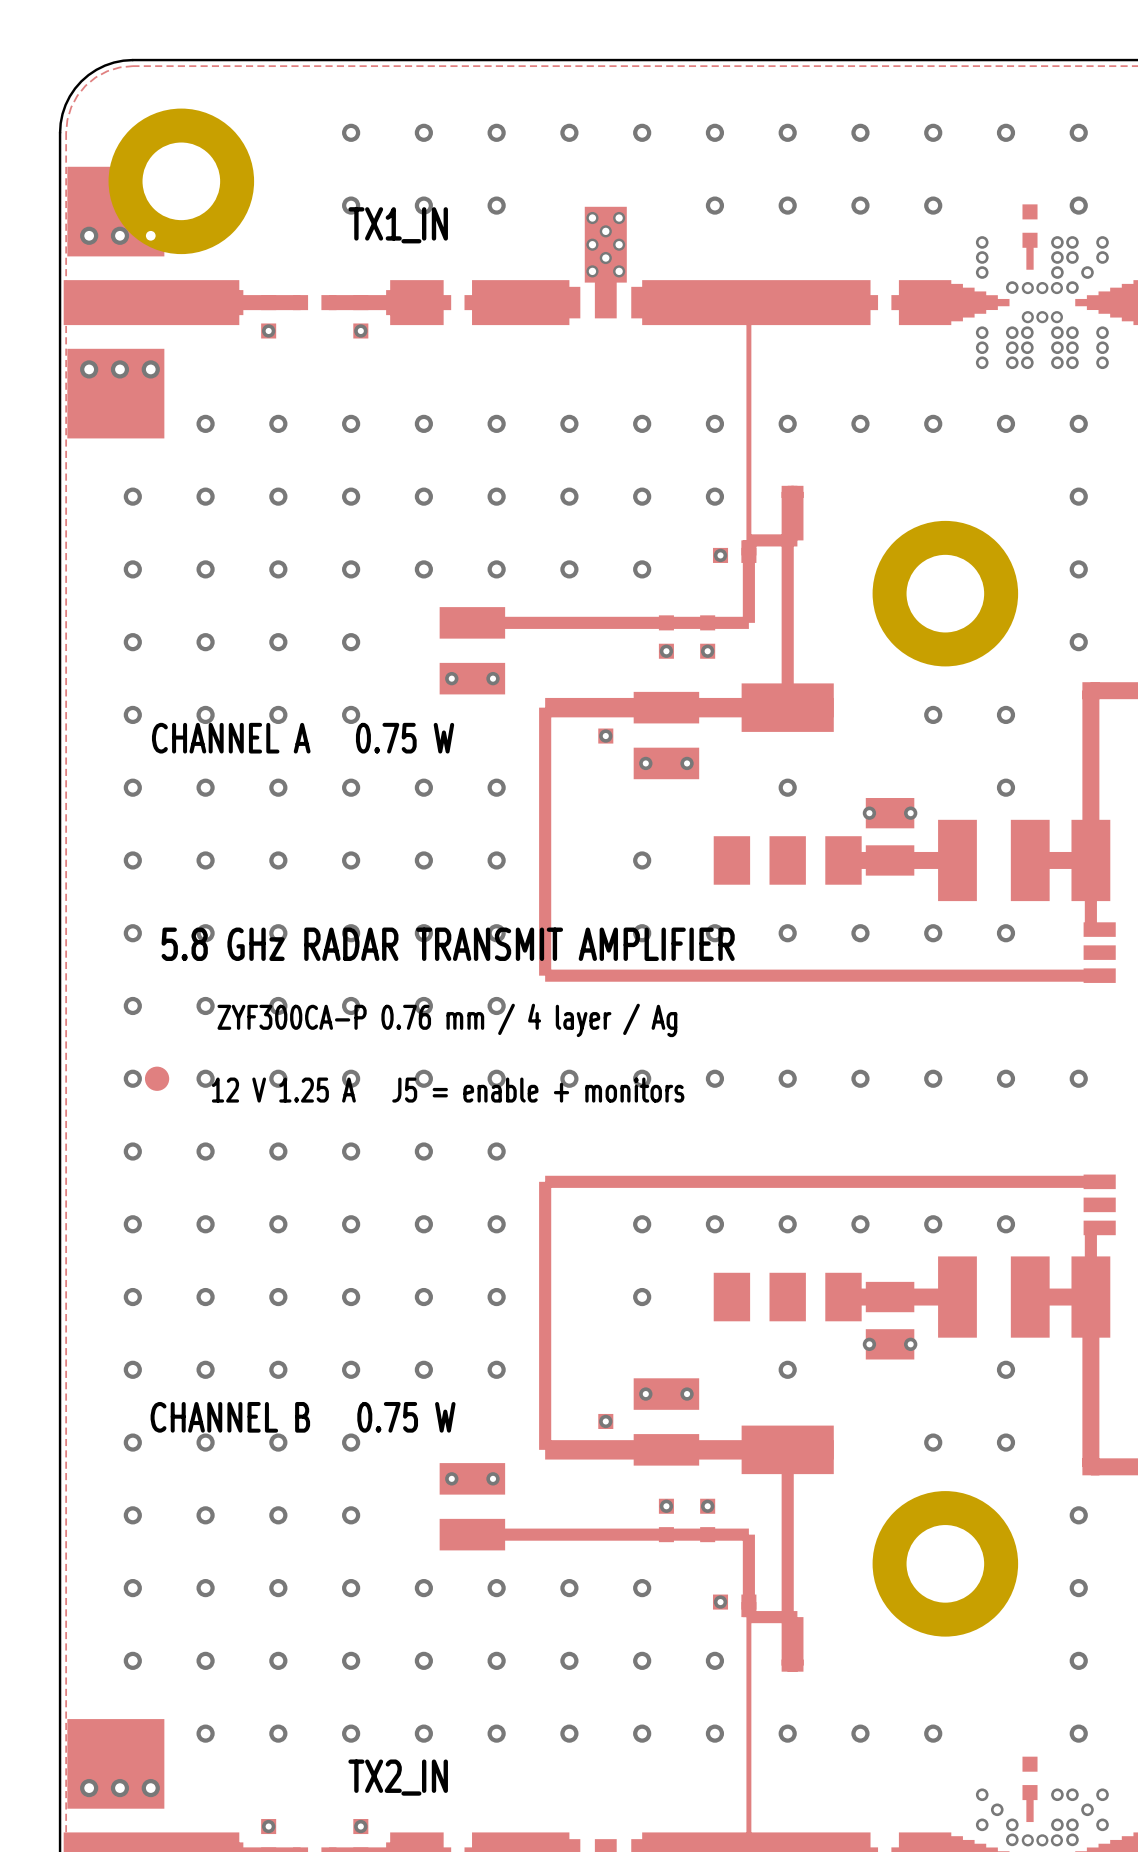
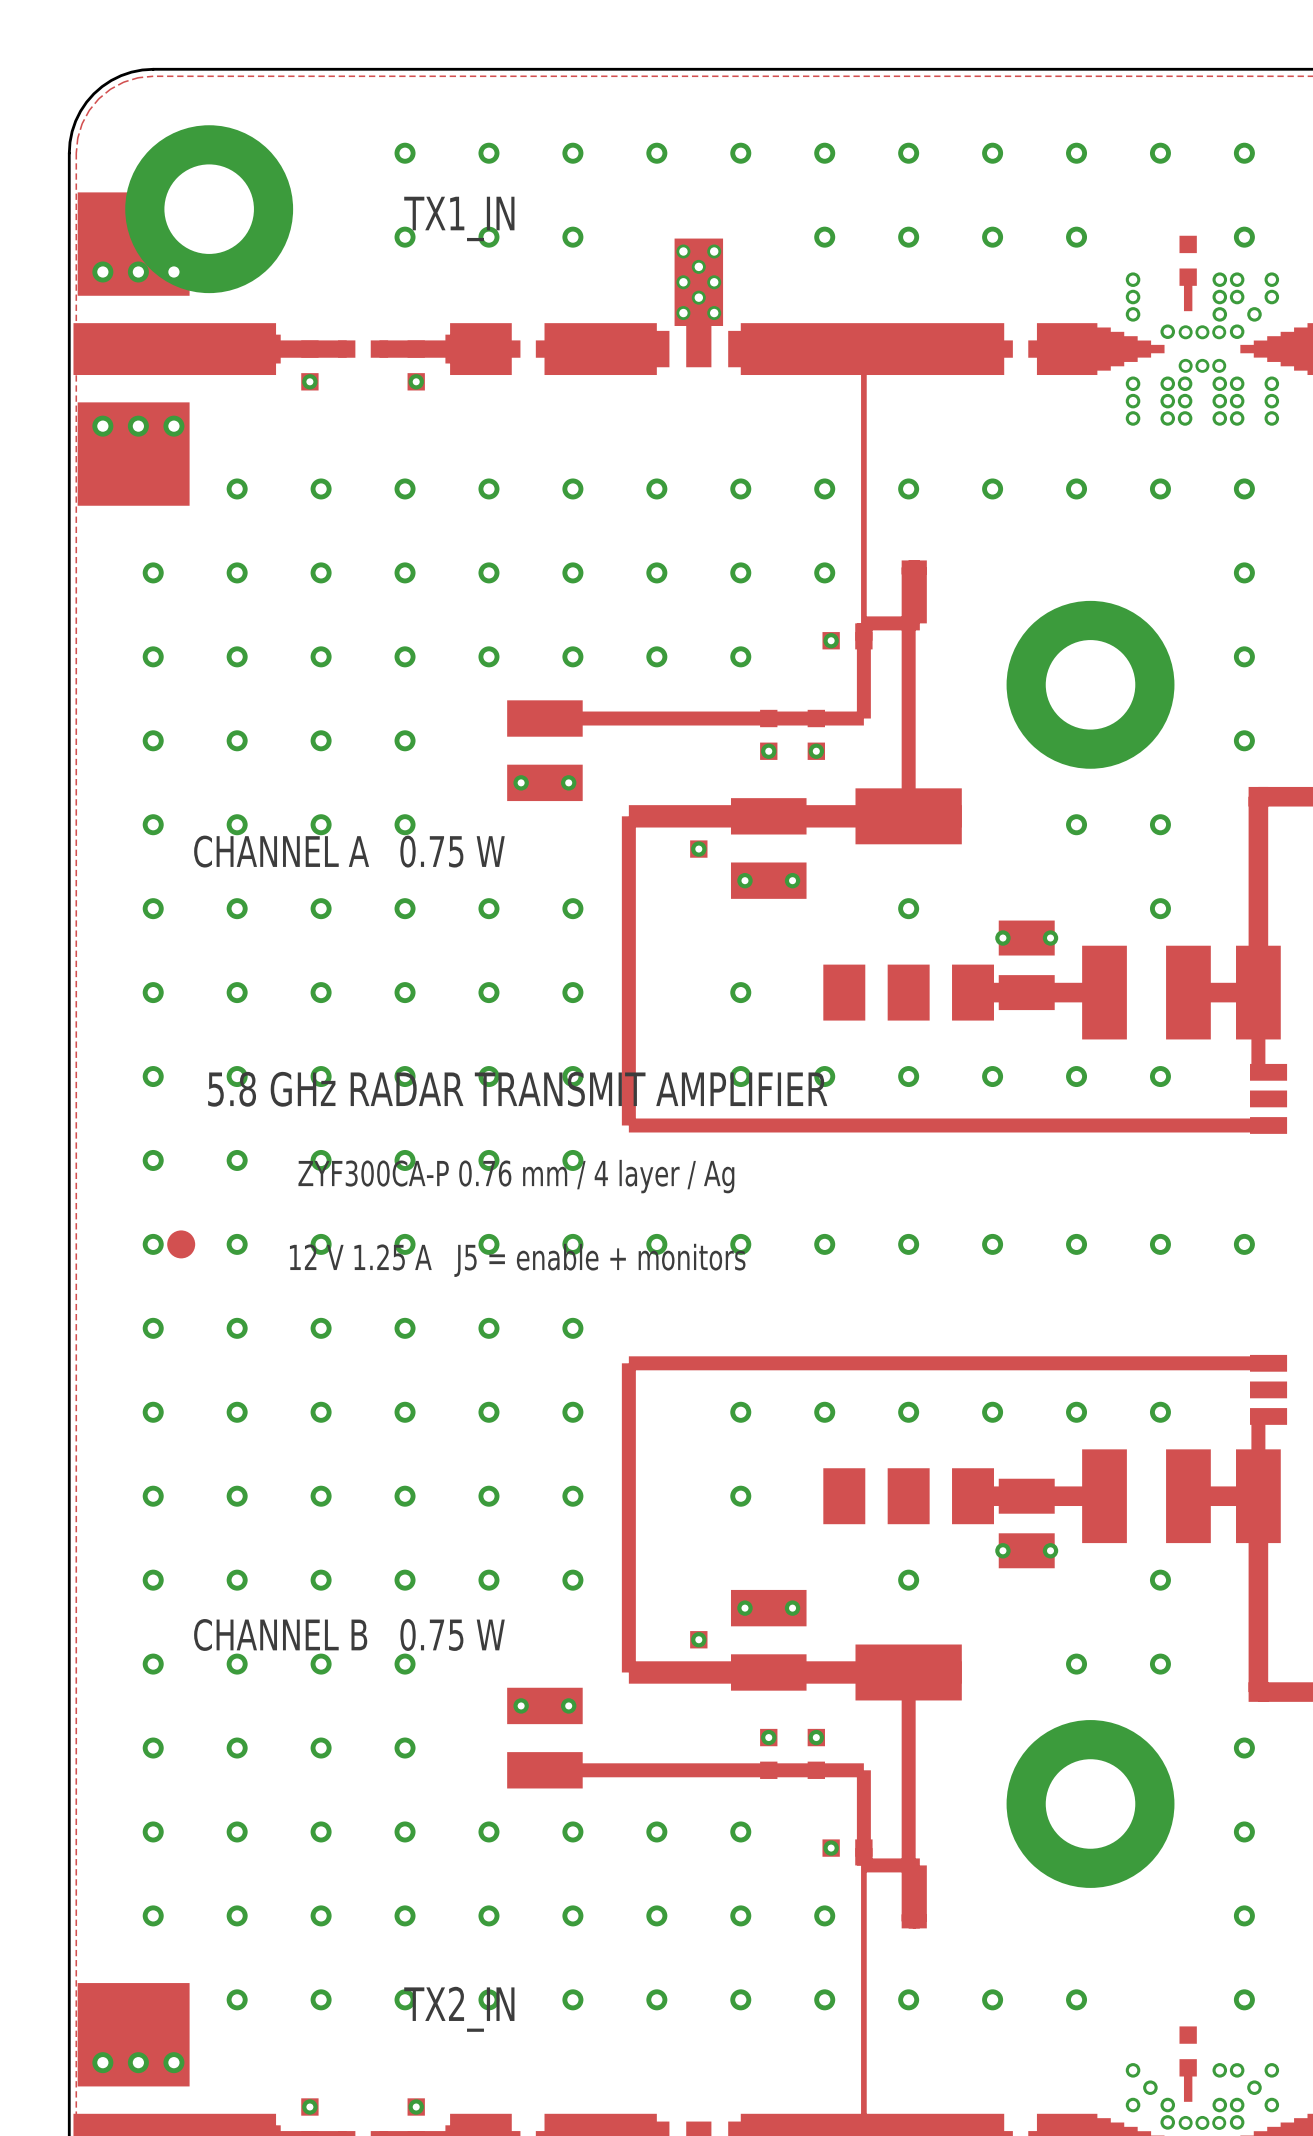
text position: TX1_IN (398, 225) -> TX1_IN (459, 218)
text position: TX2_IN (398, 1777) -> TX2_IN (459, 2009)

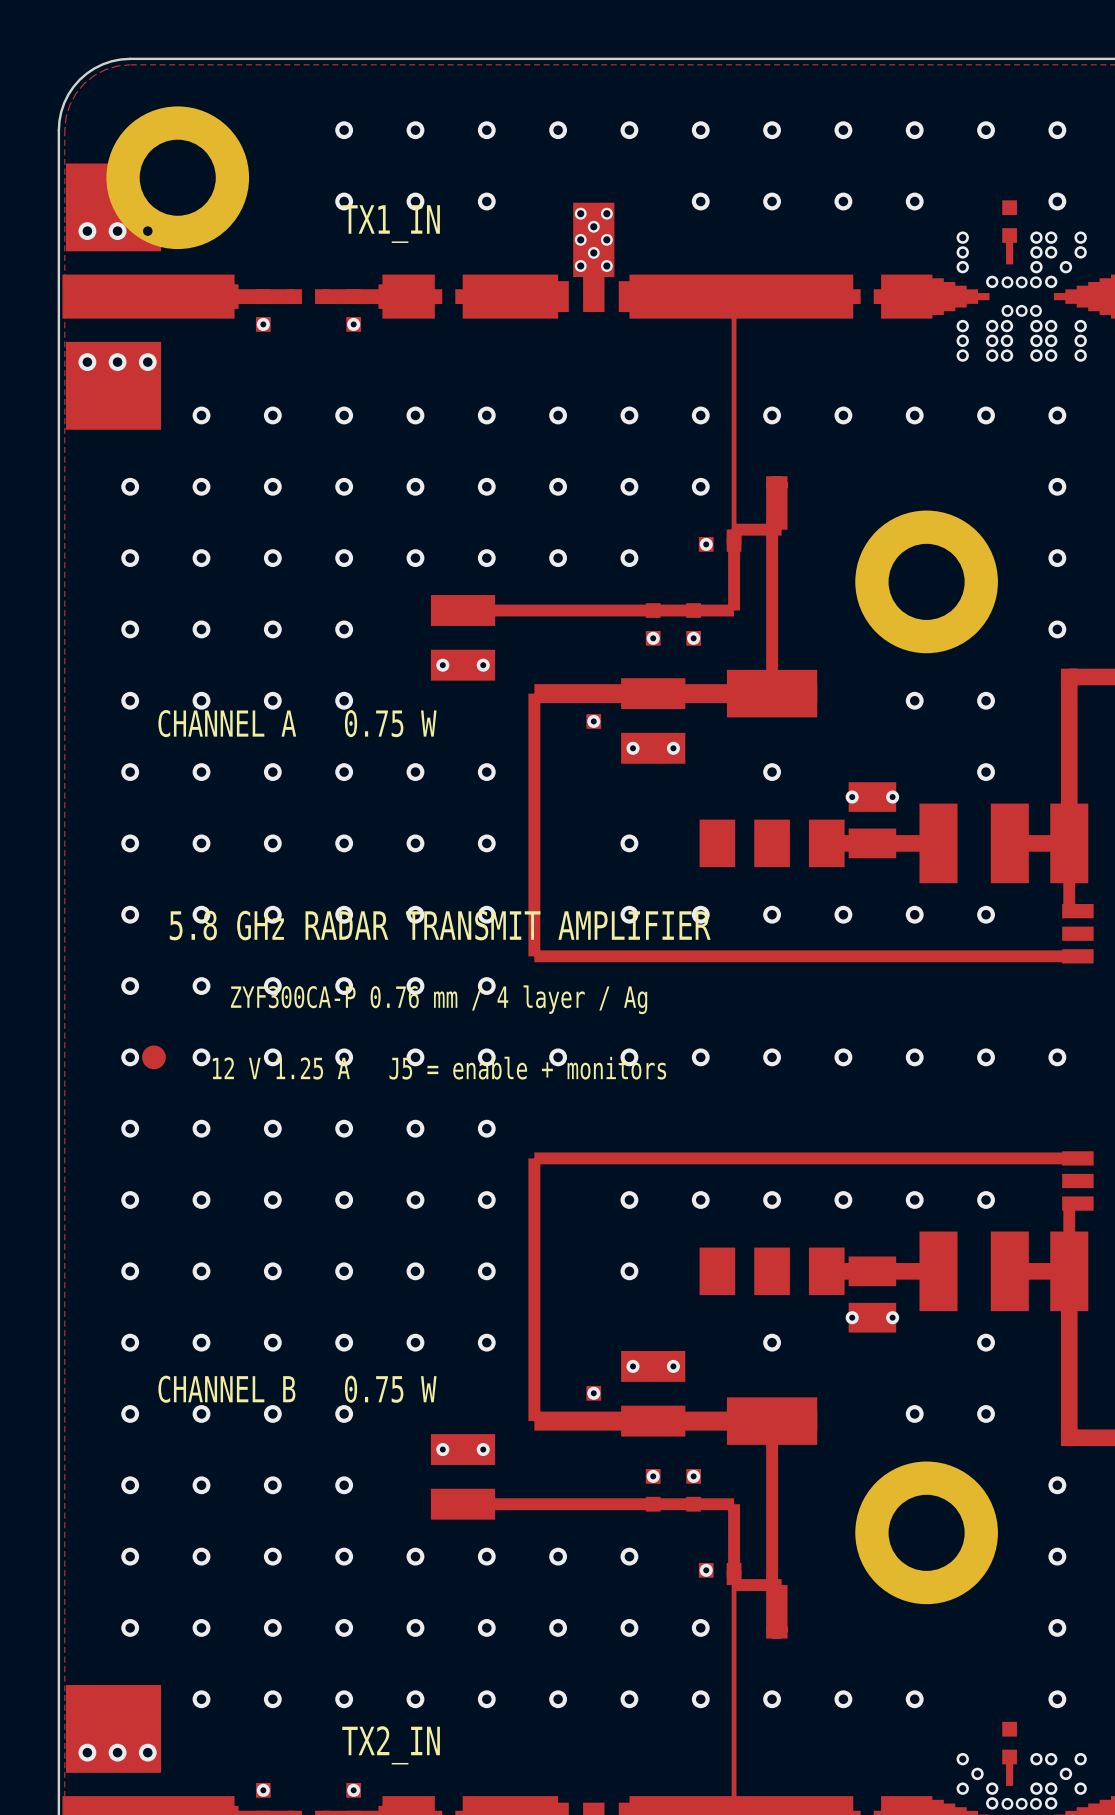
text position: TX1_IN (459, 218) -> TX1_IN (391, 224)
text position: TX2_IN (459, 2009) -> TX2_IN (391, 1745)

